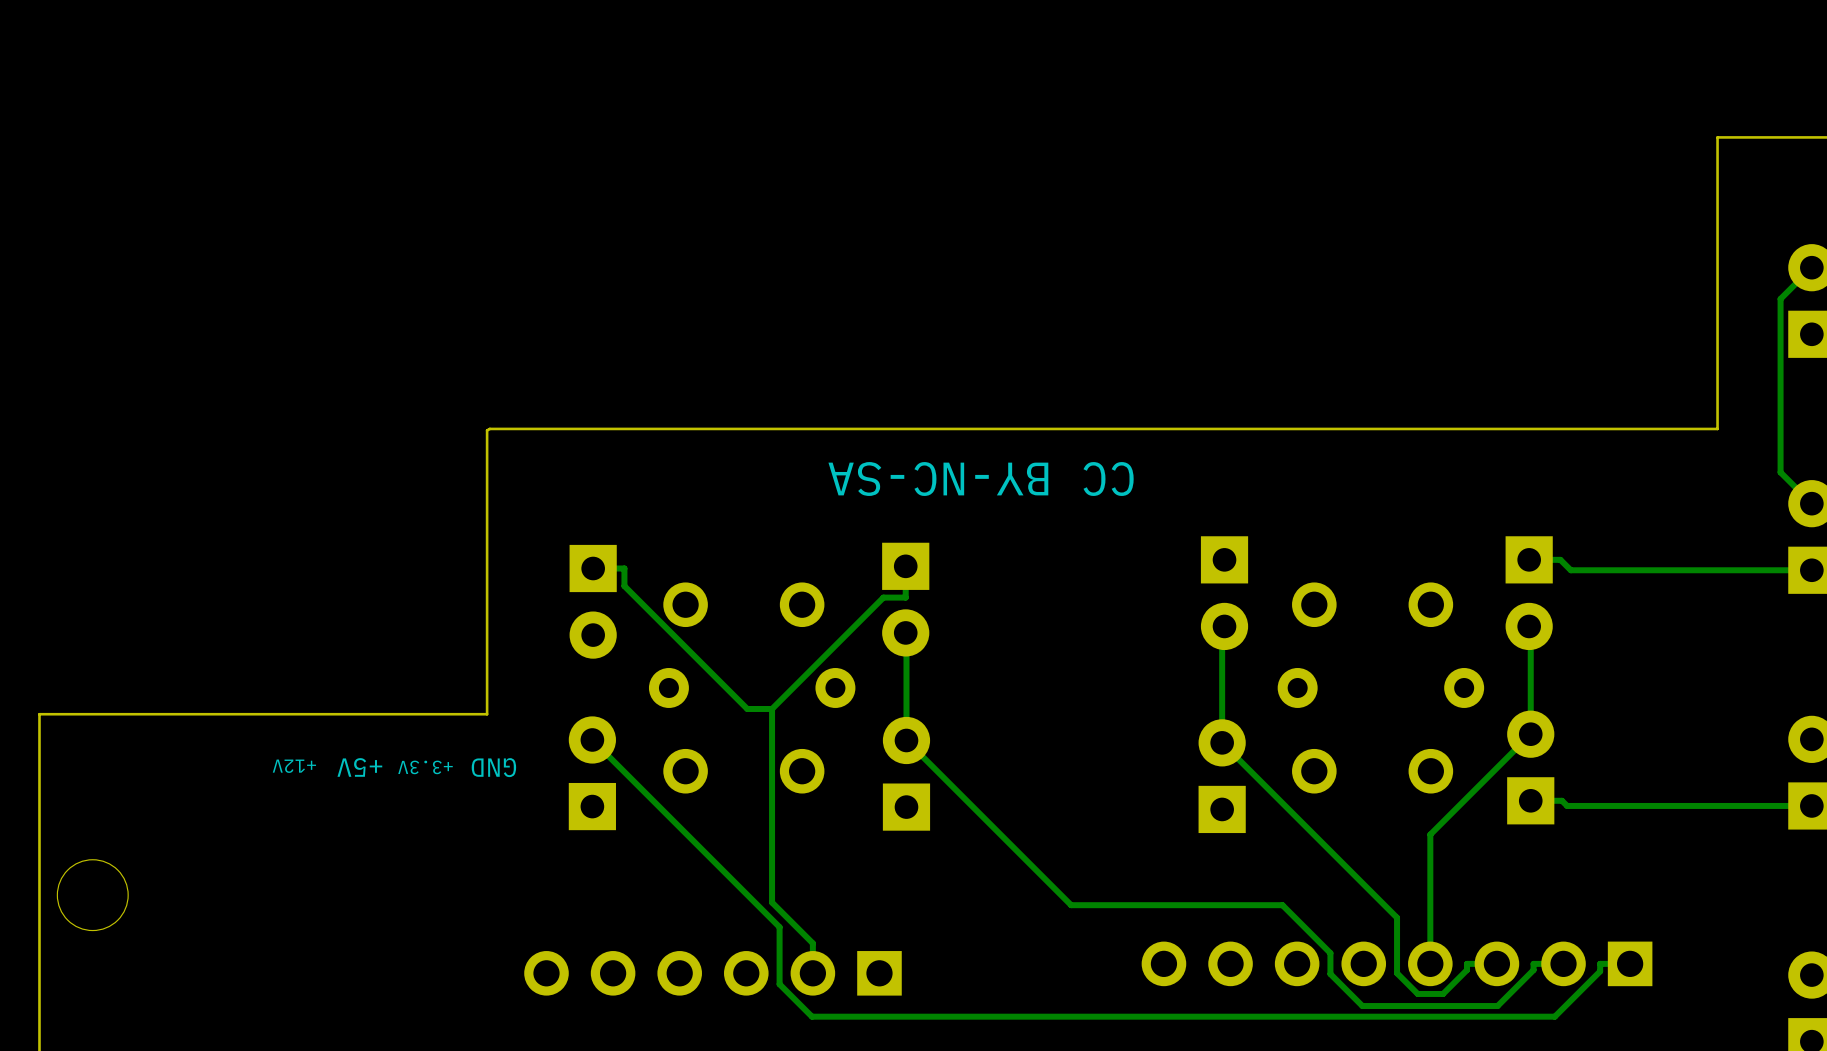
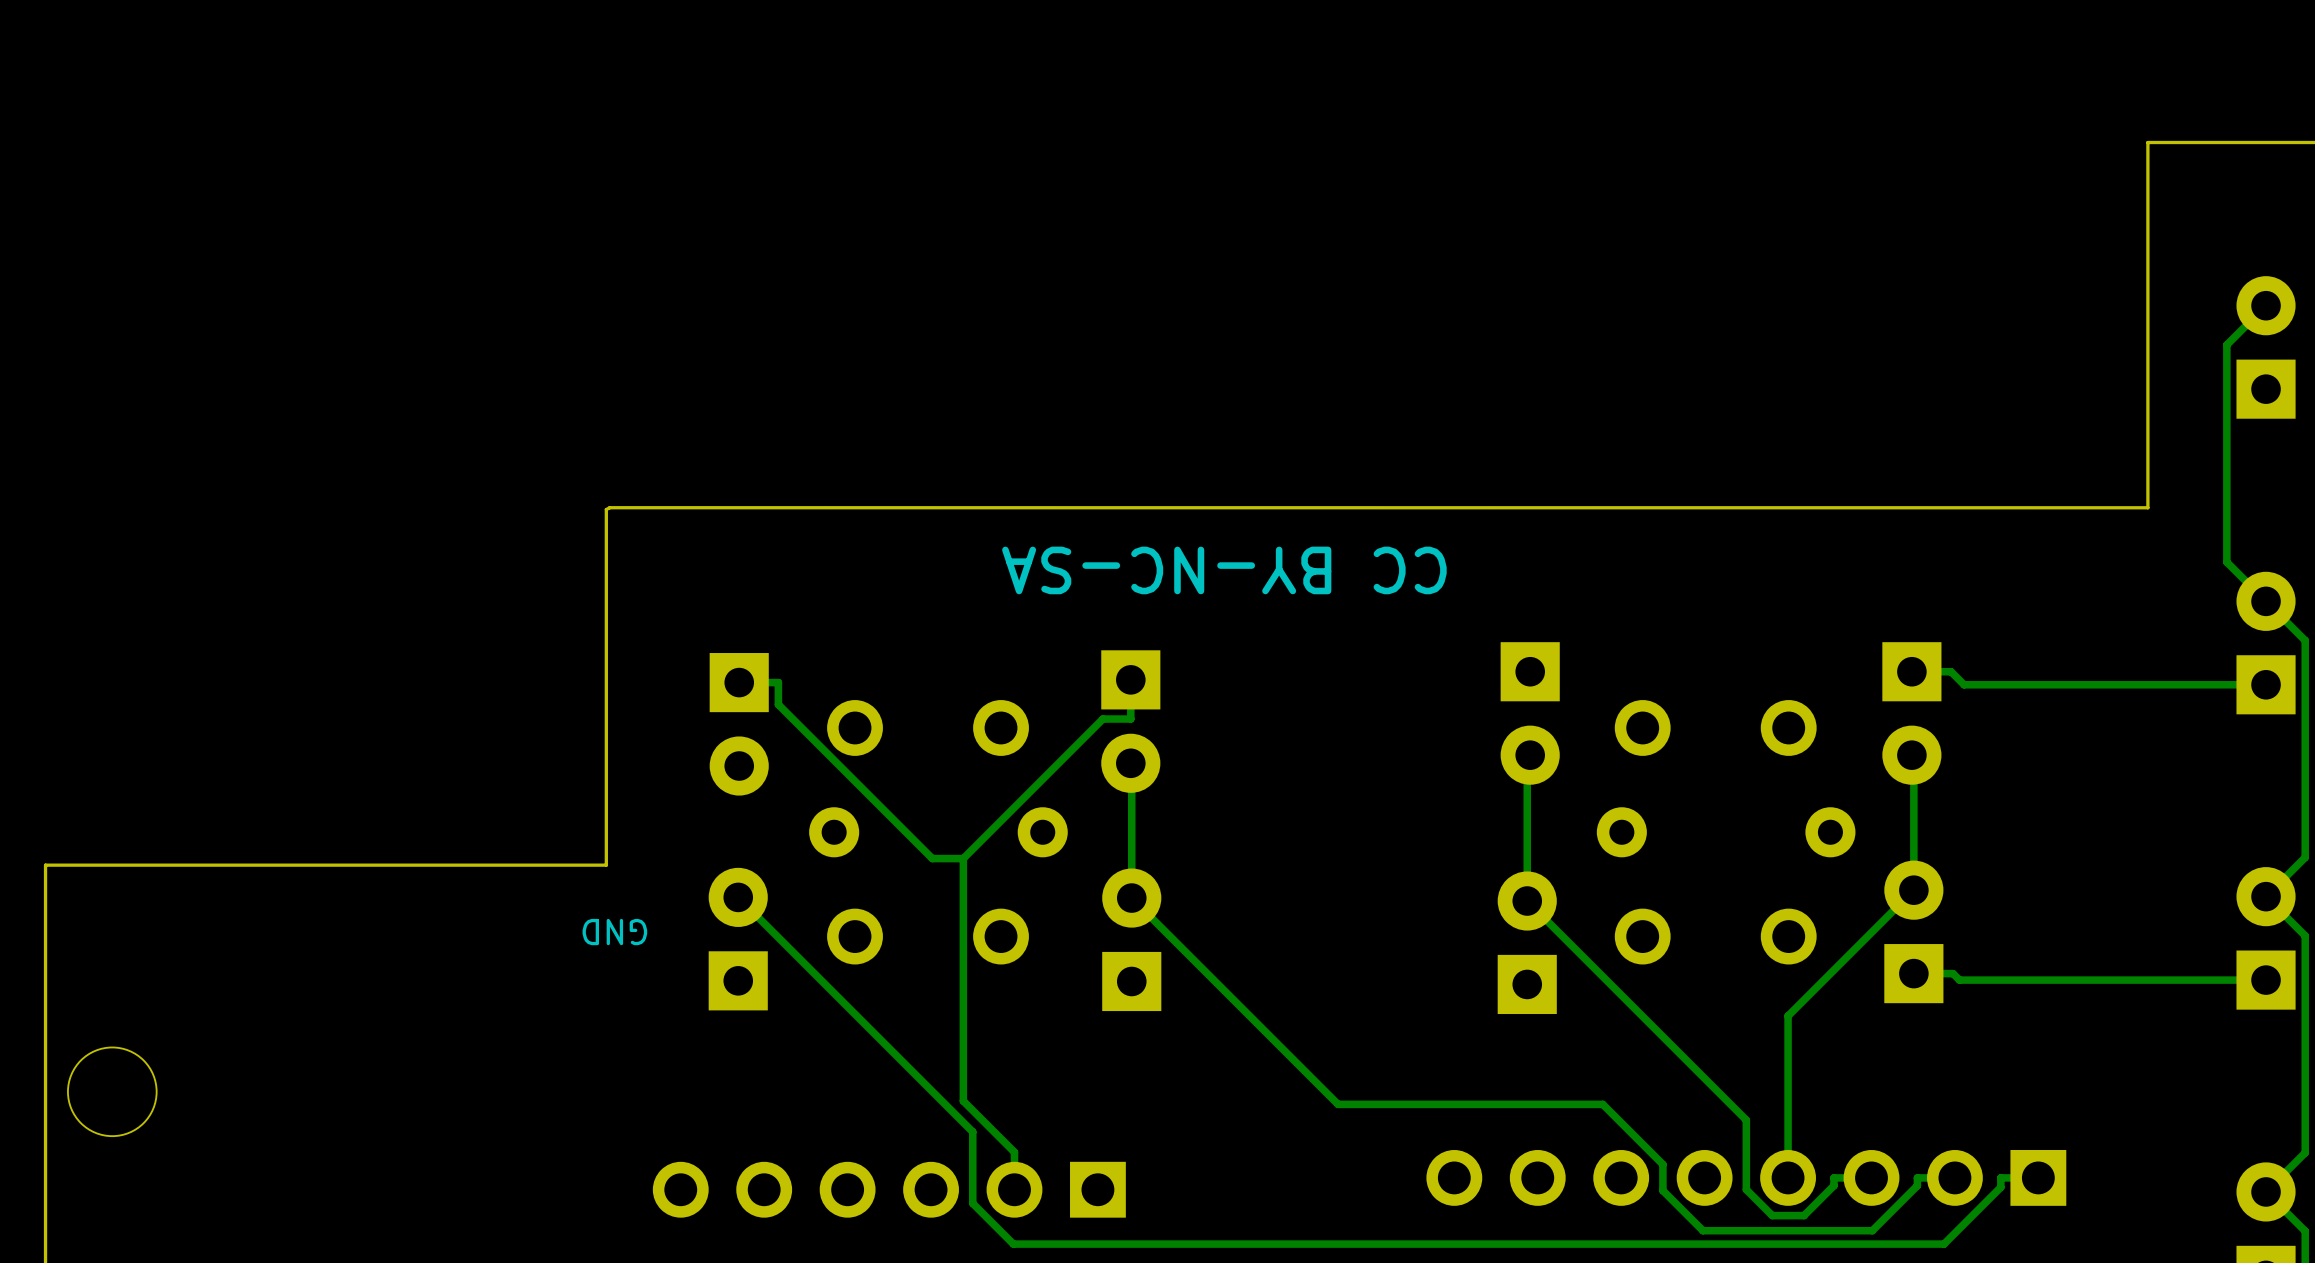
text: +12V (294, 766) -> none
text: +5V (359, 767) -> none
text: +3.3V (425, 767) -> none

